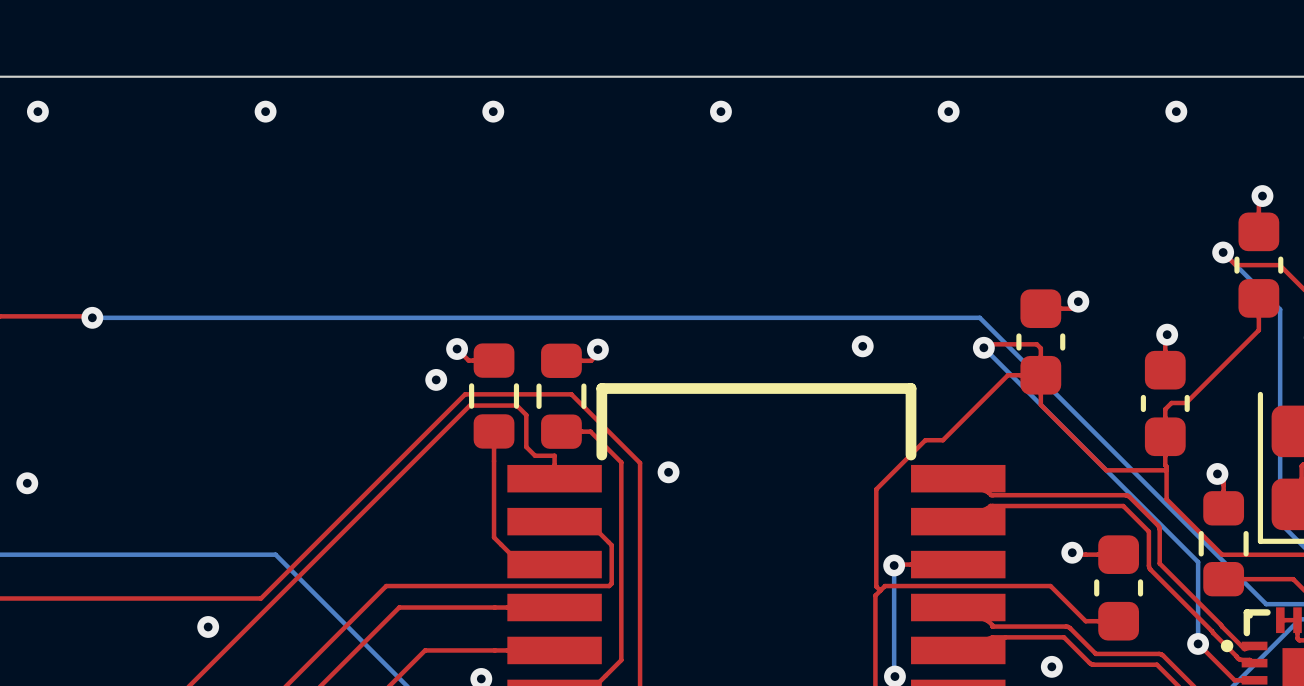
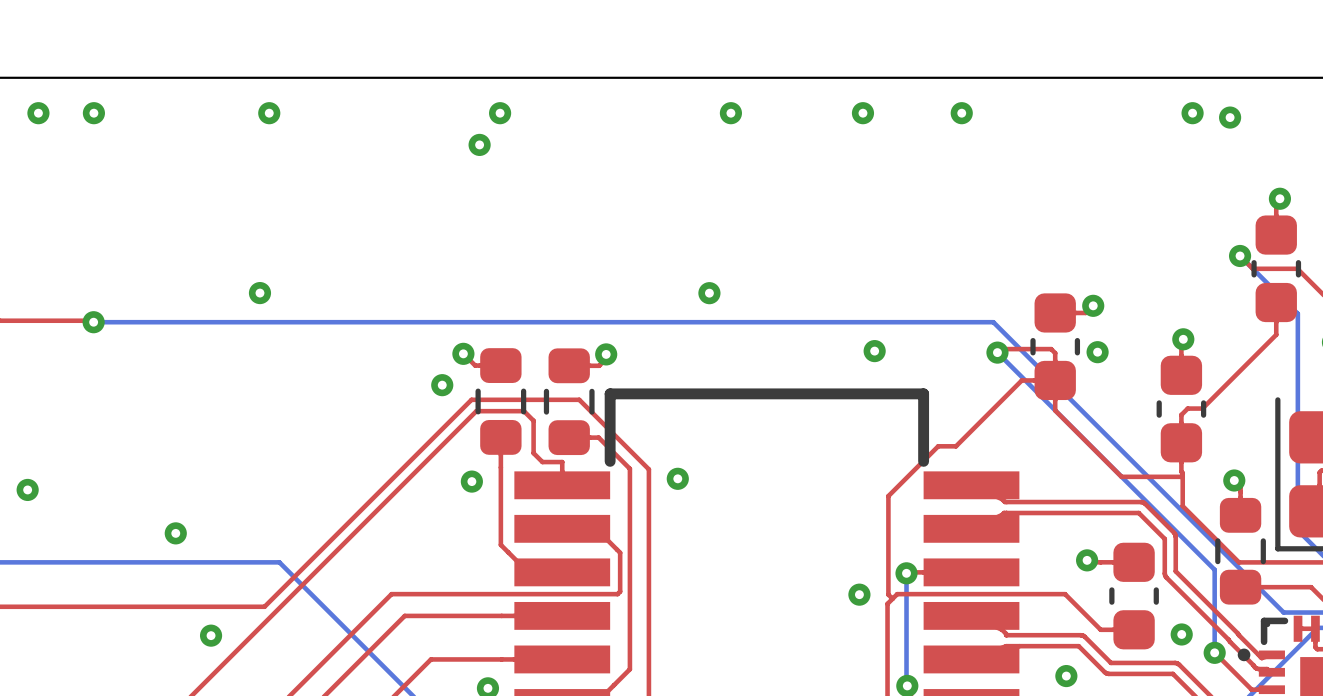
via: none -> (93, 113)
via: none -> (862, 113)
via: none -> (1230, 117)
via: none -> (479, 144)
via: none -> (259, 293)
via: none -> (709, 293)
via: none -> (1097, 352)
via: none -> (471, 481)
via: none -> (175, 533)
via: none -> (859, 594)
via: none -> (1181, 634)

